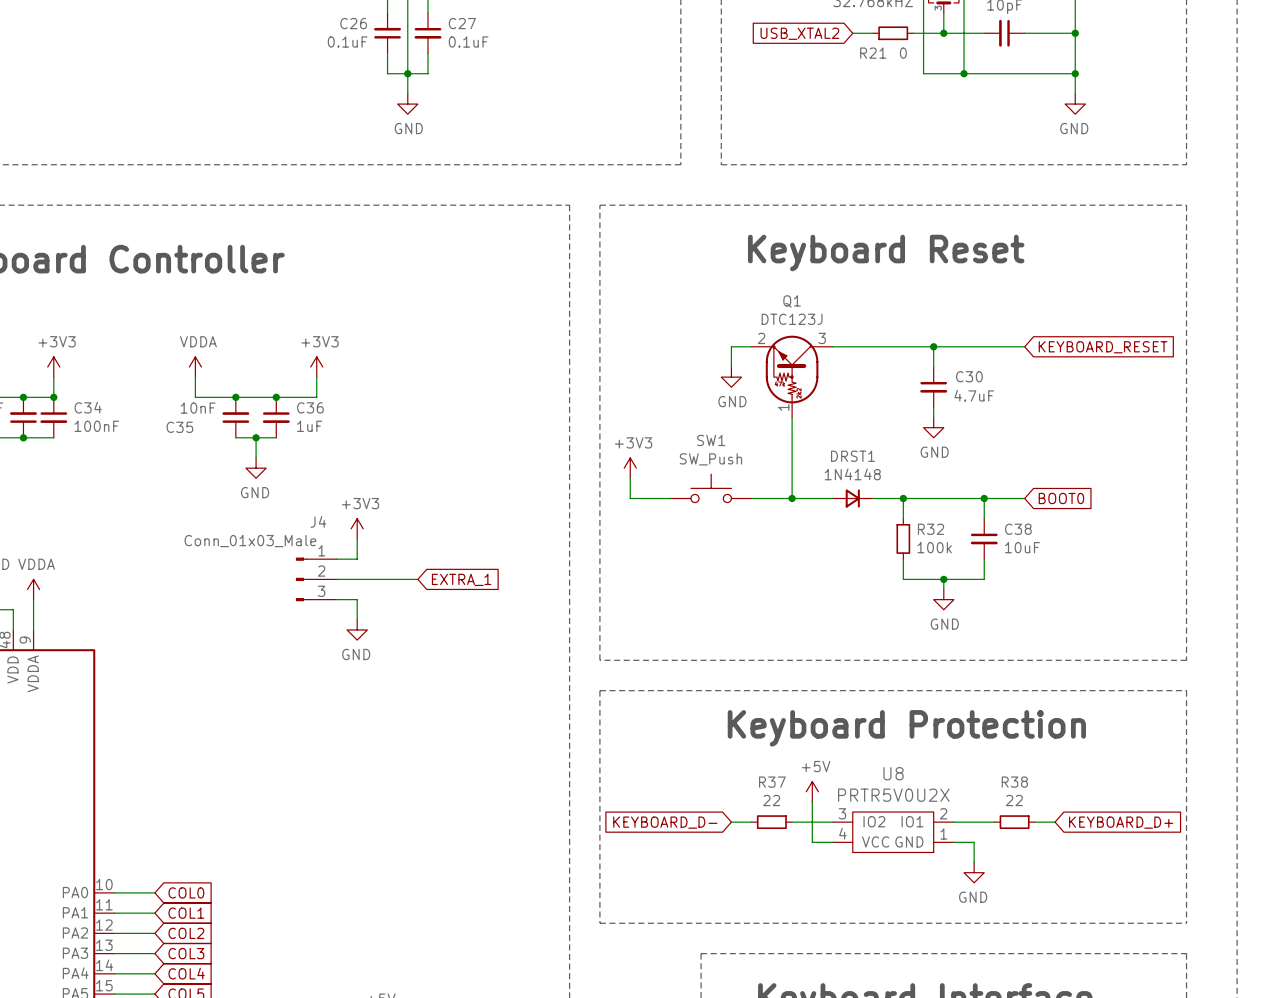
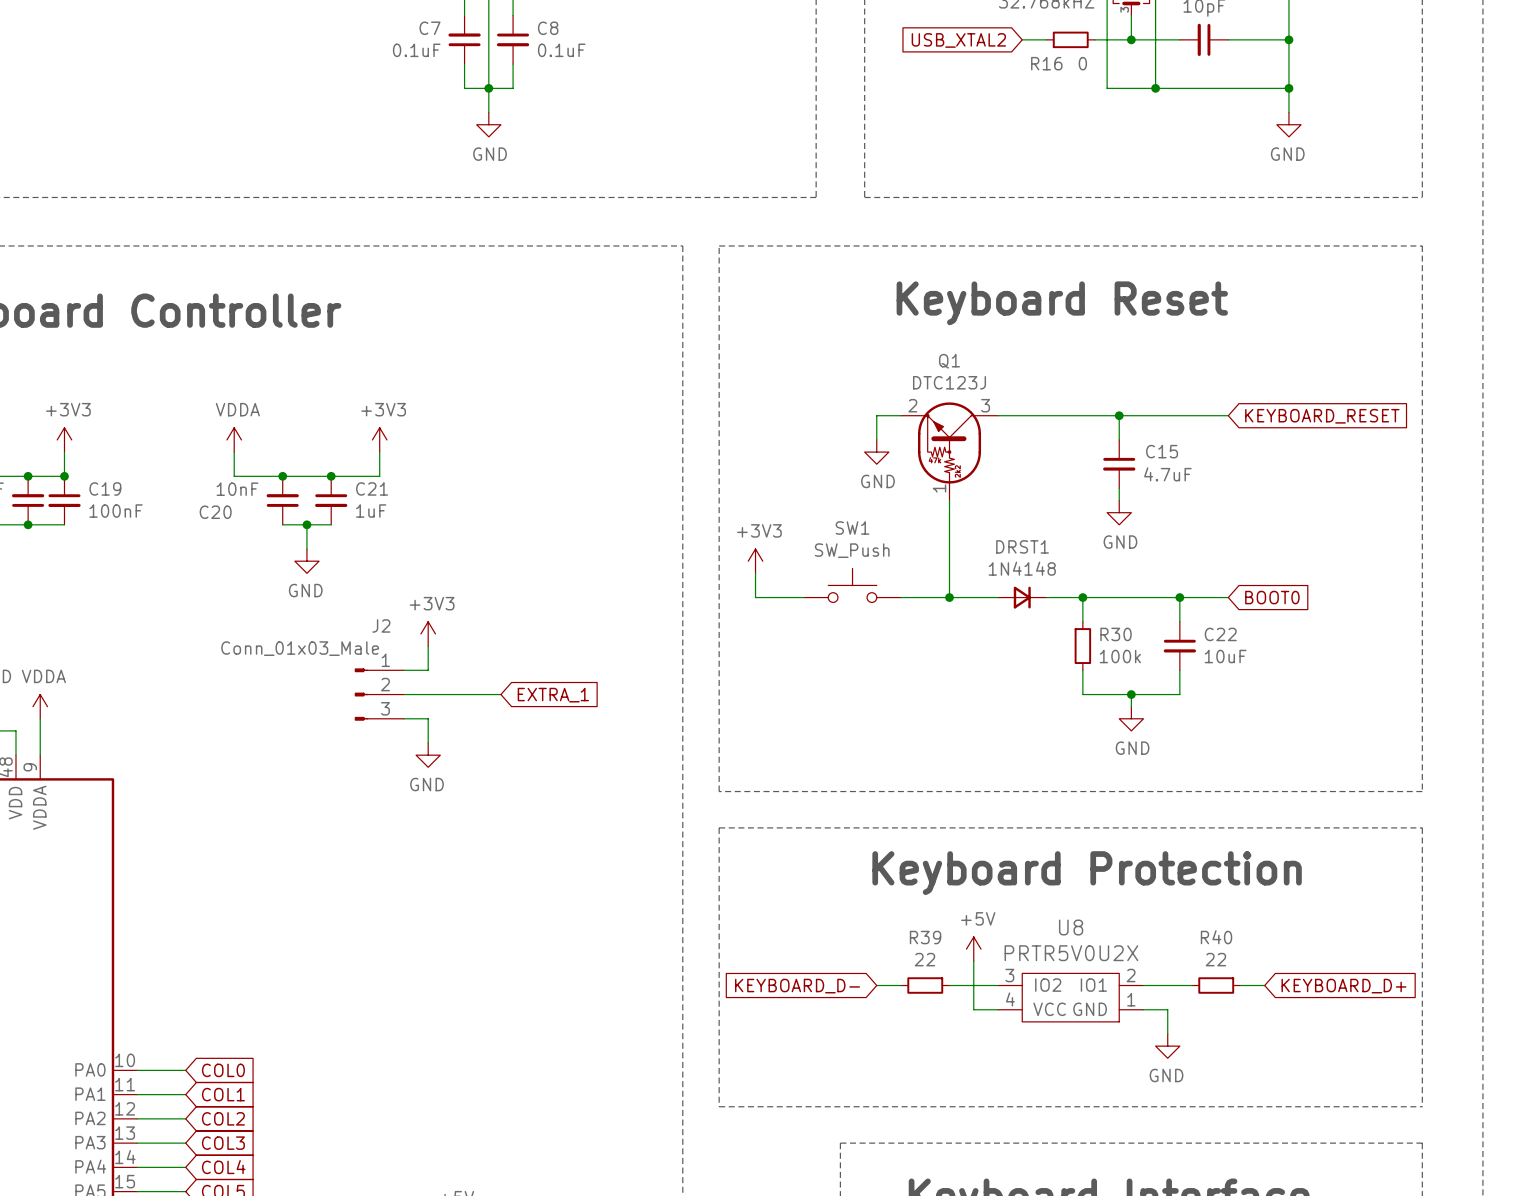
C26 name: C26 (353, 23) -> C7 (430, 28)
C27 name: C27 (462, 23) -> C8 (548, 28)
R21 name: R21 (873, 53) -> R16 (1046, 63)
C30 name: C30 (969, 376) -> C15 (1162, 451)
C34 name: C34 (88, 407) -> C19 (105, 488)
C36 name: C36 (310, 407) -> C21 (372, 488)
C35 name: C35 (179, 427) -> C20 (215, 512)
J4 name: J4 (318, 521) -> J2 (381, 625)
R32 name: R32 (931, 529) -> R30 (1116, 634)
C38 name: C38 (1018, 529) -> C22 (1220, 634)
R37 name: R37 (772, 782) -> R39 (925, 937)
R38 name: R38 (1014, 782) -> R40 (1216, 937)

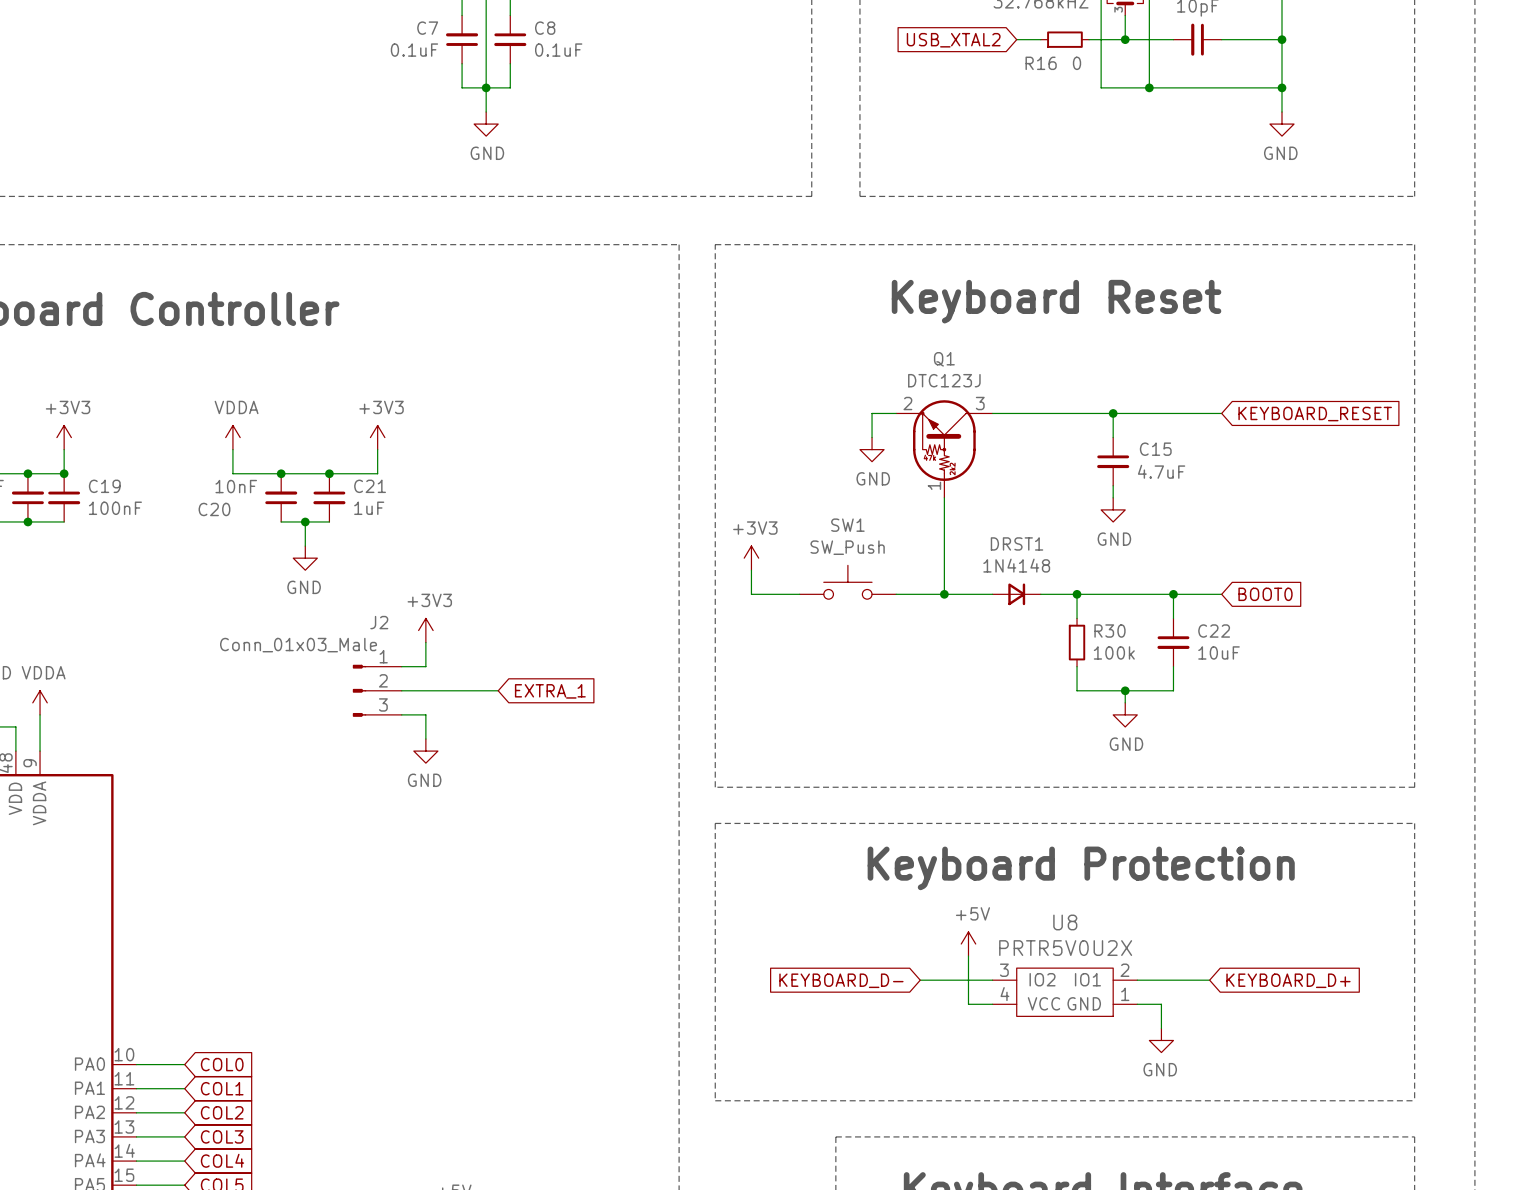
wire: (876, 985) (901, 985) -> (920, 980) (944, 980)
R39: 22 (925, 985) -> none
R40: 22 (1216, 985) -> none
wire: (1240, 985) (1264, 985) -> (1185, 980) (1209, 980)
global label position: KEYBOARD_D- (797, 986) -> KEYBOARD_D- (841, 980)
global label position: KEYBOARD_D+ (1343, 986) -> KEYBOARD_D+ (1288, 980)

